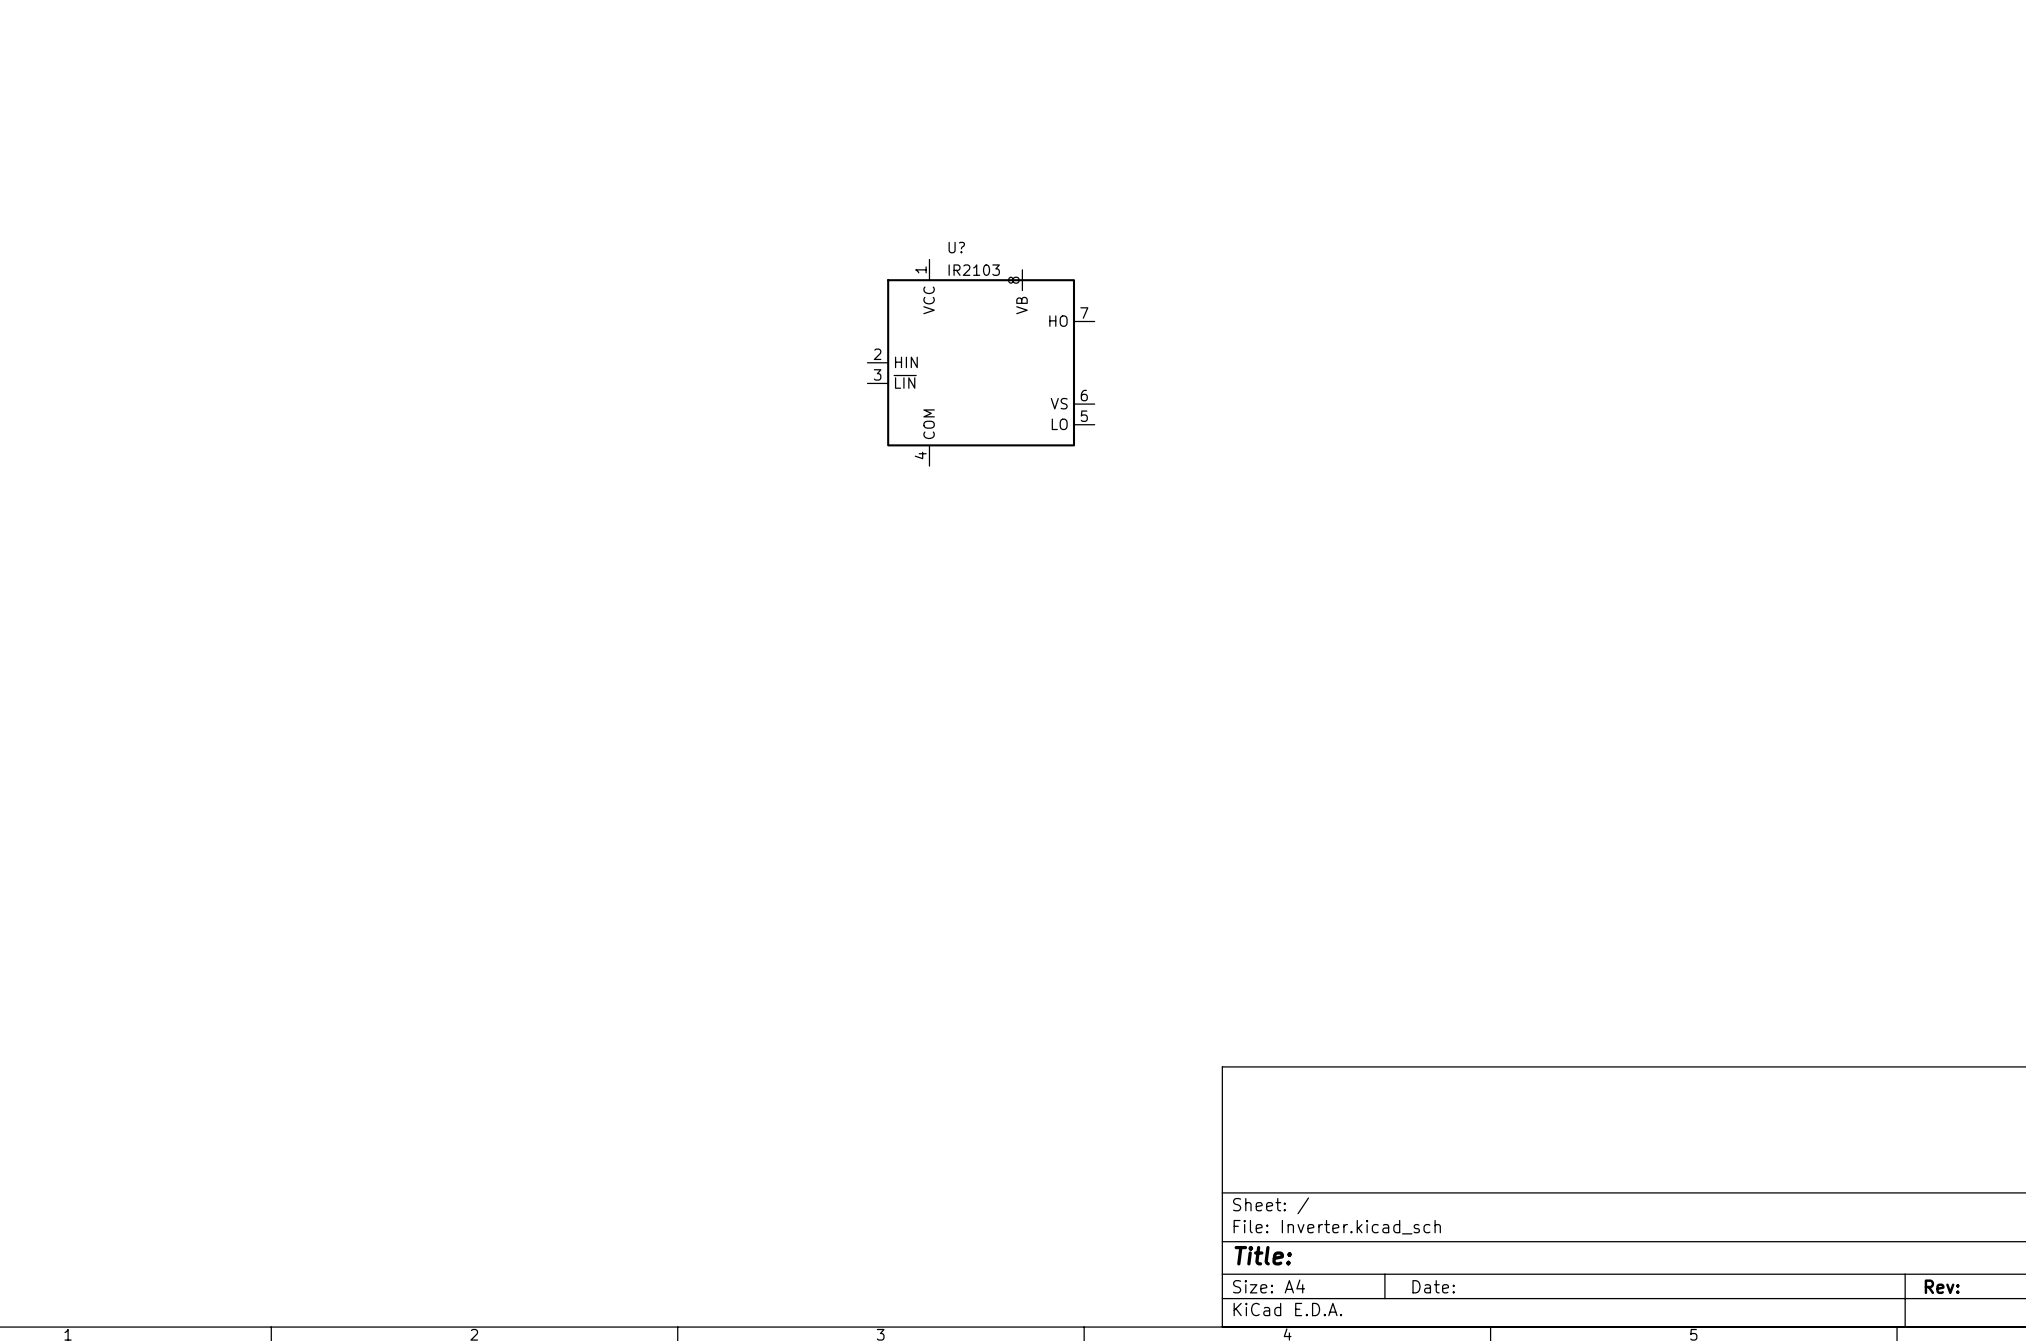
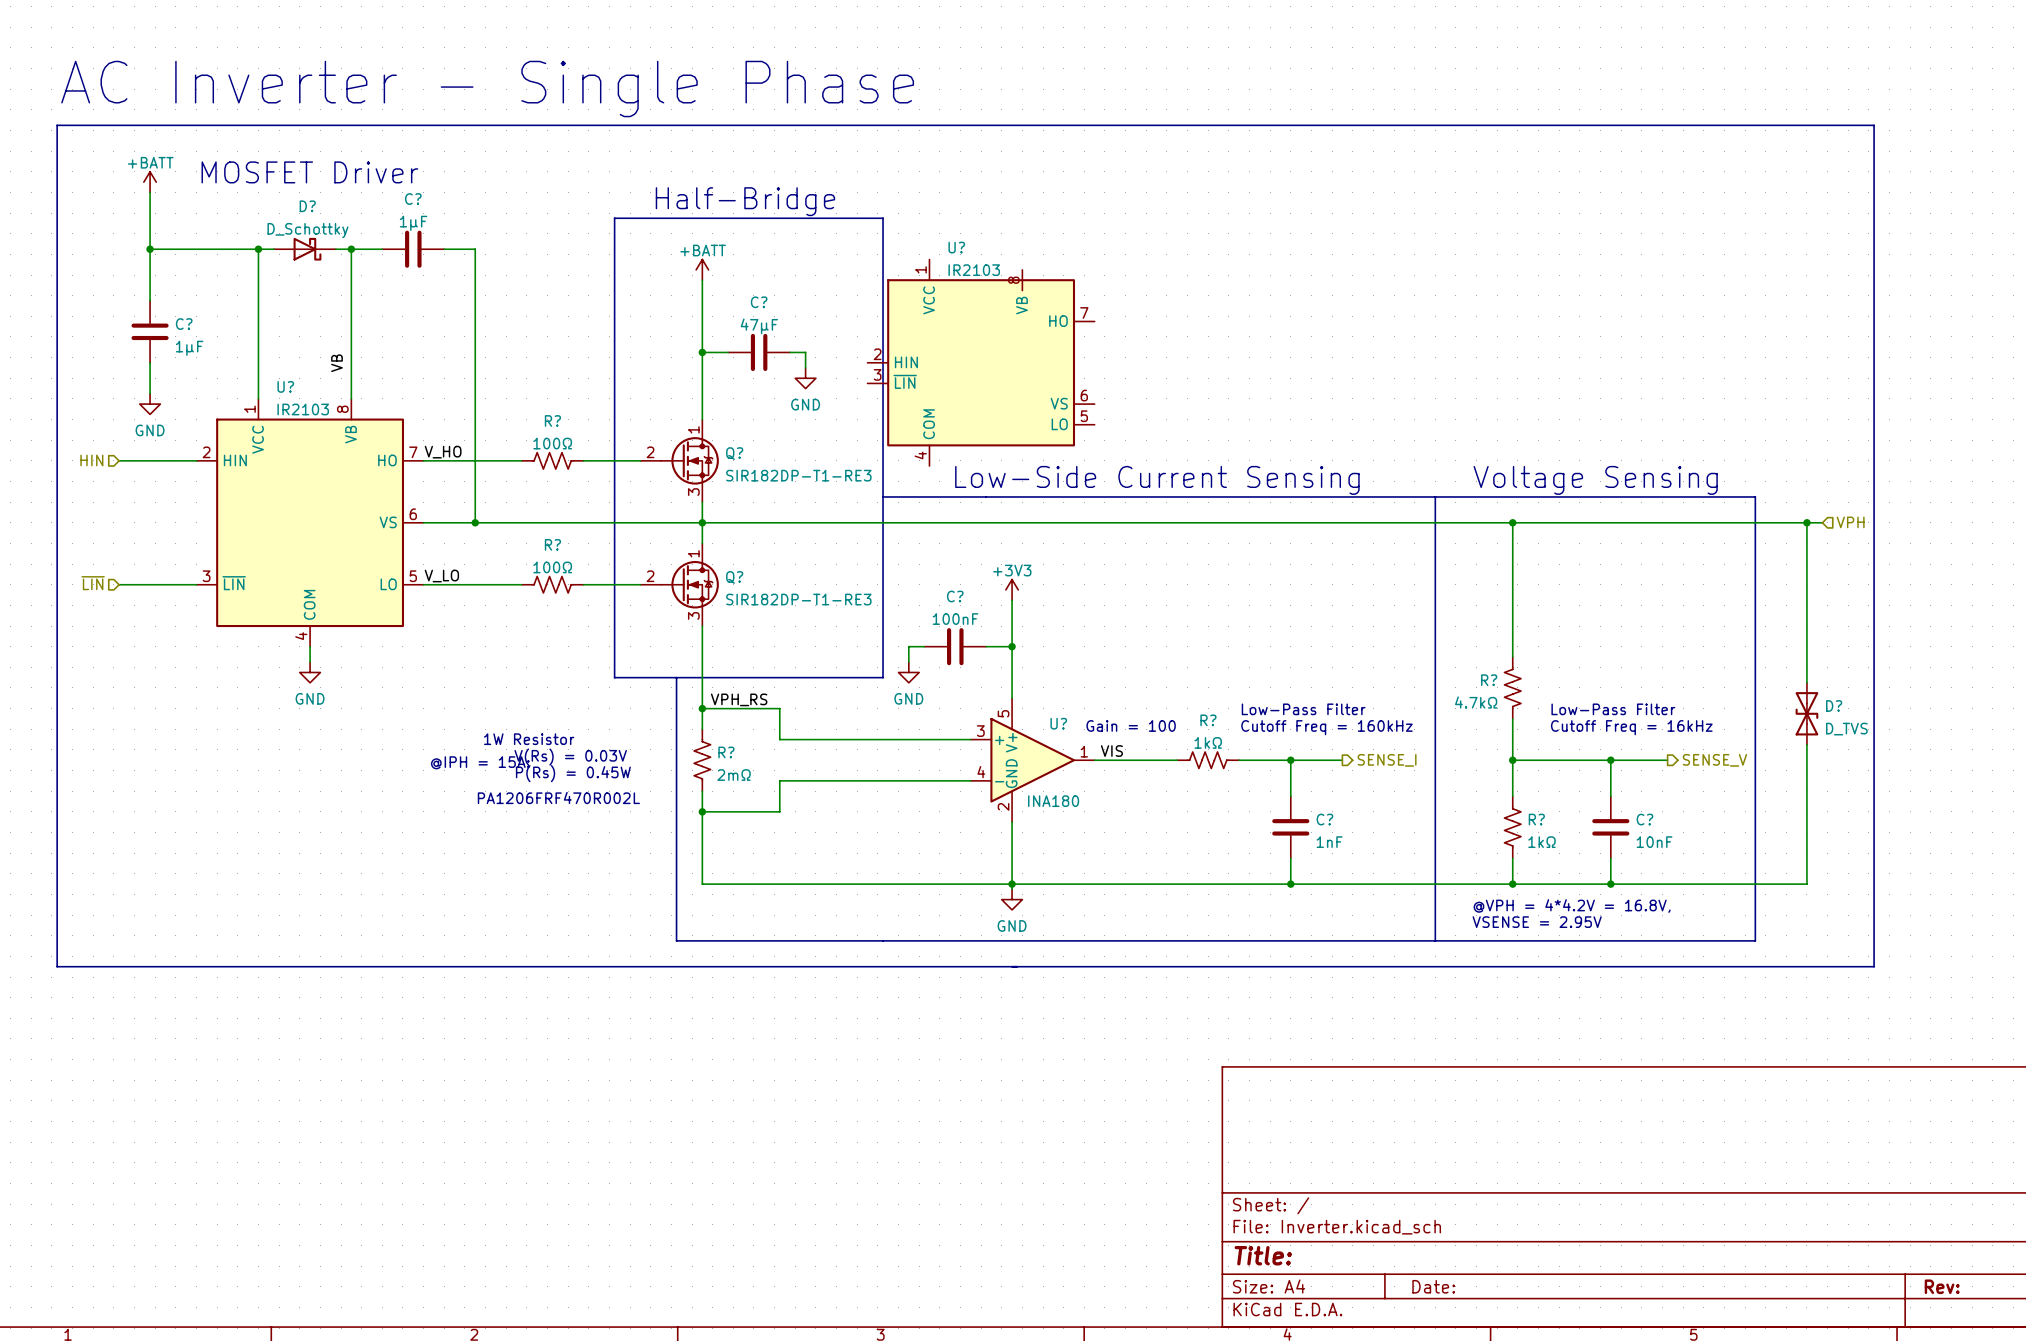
text: none -> AC Inverter - Single Phase (487, 89)
line: none -> (57, 125) (57, 966) (1874, 966) (1874, 125) (57, 125)
text: none -> MOSFET Driver (309, 172)
power symbol: none -> +BATT (150, 182)
wire: none -> (150, 192) (150, 300)
text: none -> Half-Bridge (745, 201)
line: none -> (614, 218) (614, 677) (883, 677) (883, 218) (614, 218)
wire: none -> (150, 249) (273, 249)
junction: none -> (150, 249)
wire: none -> (258, 249) (258, 398)
junction: none -> (258, 249)
D?: none -> D_Schottky (304, 249)
wire: none -> (335, 249) (382, 249)
wire: none -> (351, 249) (351, 398)
junction: none -> (351, 249)
C?: none -> 1μF (413, 249)
wire: none -> (444, 249) (475, 249) (475, 522)
power symbol: none -> +BATT (702, 269)
wire: none -> (702, 280) (702, 419)
C?: none -> 1μF (150, 331)
wire: none -> (702, 352) (728, 352)
junction: none -> (702, 352)
C?: none -> 47μF (759, 352)
wire: none -> (790, 352) (805, 352) (805, 367)
wire: none -> (150, 362) (150, 393)
label: none -> VB (336, 363)
power symbol: none -> GND (805, 378)
power symbol: none -> GND (150, 404)
label: none -> V_HO (443, 452)
hierarchical label: none -> HIN (91, 460)
wire: none -> (119, 460) (196, 460)
wire: none -> (423, 460) (521, 460)
R?: none -> 100Ω (552, 460)
wire: none -> (583, 460) (640, 460)
Q?: none -> SIR182DP-T1-RE3 (679, 460)
text: none -> Low-Side Current Sensing (1157, 480)
text: none -> Voltage Sensing (1595, 480)
line: none -> (883, 496) (1755, 496) (1755, 940) (676, 940) (676, 677)
line: none -> (1435, 496) (1435, 940)
wire: none -> (702, 502) (702, 543)
U?: none -> IR2103 (310, 522)
wire: none -> (423, 522) (1822, 522)
junction: none -> (475, 522)
junction: none -> (702, 522)
wire: none -> (1512, 522) (1512, 657)
junction: none -> (1512, 522)
wire: none -> (1806, 522) (1806, 682)
junction: none -> (1806, 522)
hierarchical label: none -> VPH (1850, 522)
label: none -> V_LO (441, 576)
hierarchical label: none -> ~{LIN} (93, 583)
wire: none -> (119, 584) (196, 584)
wire: none -> (423, 584) (521, 584)
R?: none -> 100Ω (552, 584)
wire: none -> (583, 584) (640, 584)
Q?: none -> SIR182DP-T1-RE3 (679, 584)
power symbol: none -> +3V3 (1012, 589)
wire: none -> (1012, 600) (1012, 698)
wire: none -> (702, 626) (702, 729)
wire: none -> (310, 646) (310, 662)
wire: none -> (924, 646) (908, 646) (908, 662)
C?: none -> 100nF (955, 646)
wire: none -> (986, 646) (1012, 646)
junction: none -> (1012, 646)
power symbol: none -> GND (310, 672)
power symbol: none -> GND (908, 672)
R?: none -> 4.7kΩ (1512, 687)
label: none -> VPH_RS (739, 699)
wire: none -> (702, 708) (779, 708) (779, 739) (970, 739)
junction: none -> (702, 708)
text: none -> Low-Pass Filter (1303, 709)
text: none -> Low-Pass Filter (1613, 709)
D?: none -> D_TVS (1806, 713)
wire: none -> (1512, 718) (1512, 796)
text: none -> Gain = 100 (1131, 725)
text: none -> Cutoff Freq = 160kHz (1327, 727)
text: none -> Cutoff Freq = 16kHz (1631, 727)
text: none -> 1W Resistor (529, 739)
wire: none -> (1806, 744) (1806, 884) (702, 884) (702, 791)
label: none -> VIS (1111, 751)
text: none -> V(Rs) = 0.03V (570, 757)
R?: none -> 2mΩ (702, 760)
U?: none -> INA180 (1032, 760)
wire: none -> (1094, 760) (1177, 760)
R?: none -> 1kΩ (1208, 760)
wire: none -> (1239, 760) (1342, 760)
wire: none -> (1290, 760) (1290, 796)
junction: none -> (1290, 760)
hierarchical label: none -> SENSE_I (1387, 760)
wire: none -> (1512, 760) (1667, 760)
junction: none -> (1512, 760)
wire: none -> (1610, 760) (1610, 796)
junction: none -> (1610, 760)
hierarchical label: none -> SENSE_V (1714, 760)
text: none -> @IPH = 15A: (480, 762)
text: none -> P(Rs) = 0.45W (573, 773)
wire: none -> (970, 780) (779, 780) (779, 811) (702, 811)
text: none -> PA1206FRF470R002L (558, 797)
junction: none -> (702, 811)
wire: none -> (1012, 822) (1012, 889)
C?: none -> 1nF (1290, 827)
R?: none -> 1kΩ (1512, 827)
C?: none -> 10nF (1610, 827)
wire: none -> (1290, 858) (1290, 884)
wire: none -> (1512, 858) (1512, 884)
wire: none -> (1610, 858) (1610, 884)
junction: none -> (1012, 884)
junction: none -> (1290, 884)
junction: none -> (1512, 884)
junction: none -> (1610, 884)
power symbol: none -> GND (1012, 899)
text: none -> @VPH = 4*4.2V = 16.8V, (1572, 905)
text: none -> VSENSE = 2.95V (1537, 922)

